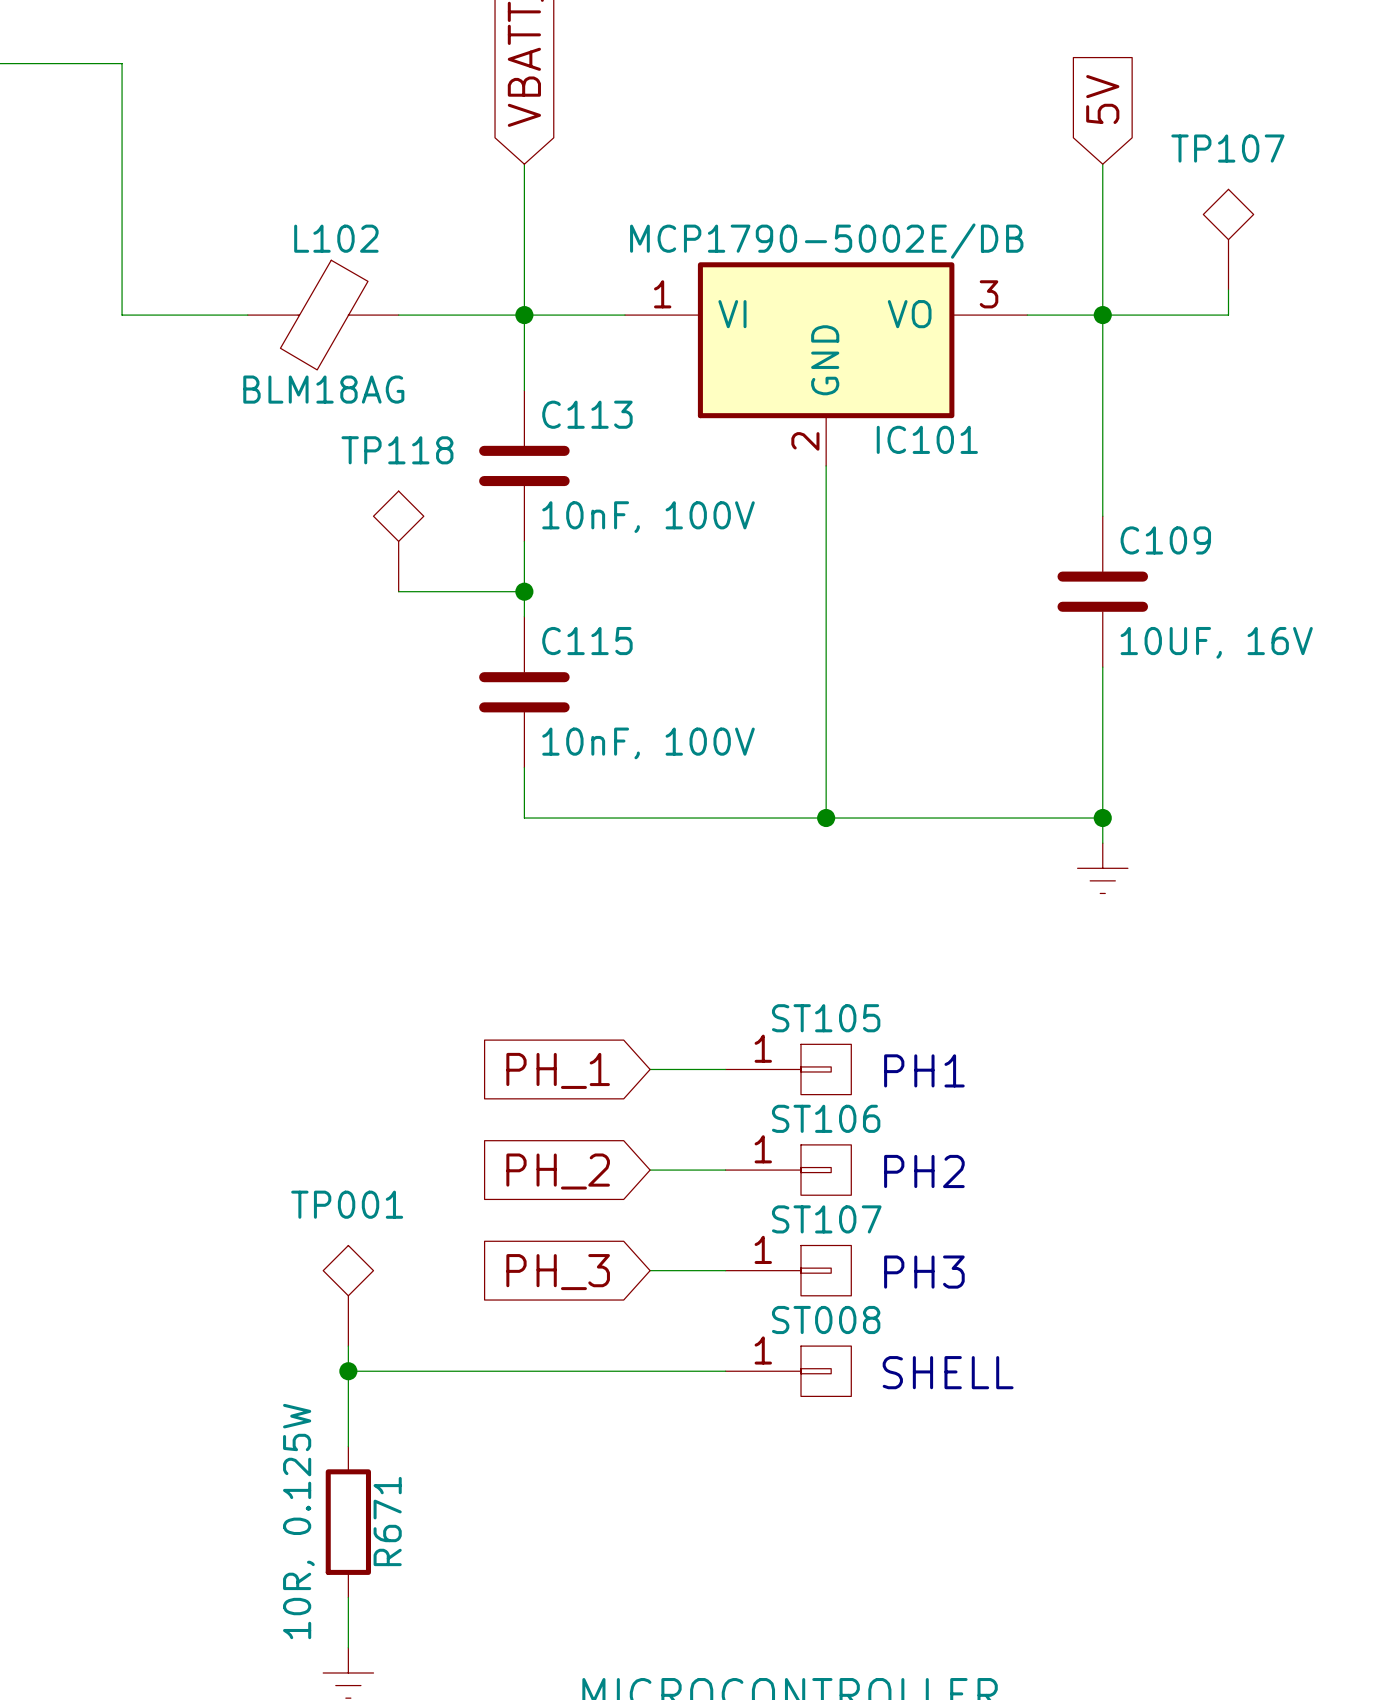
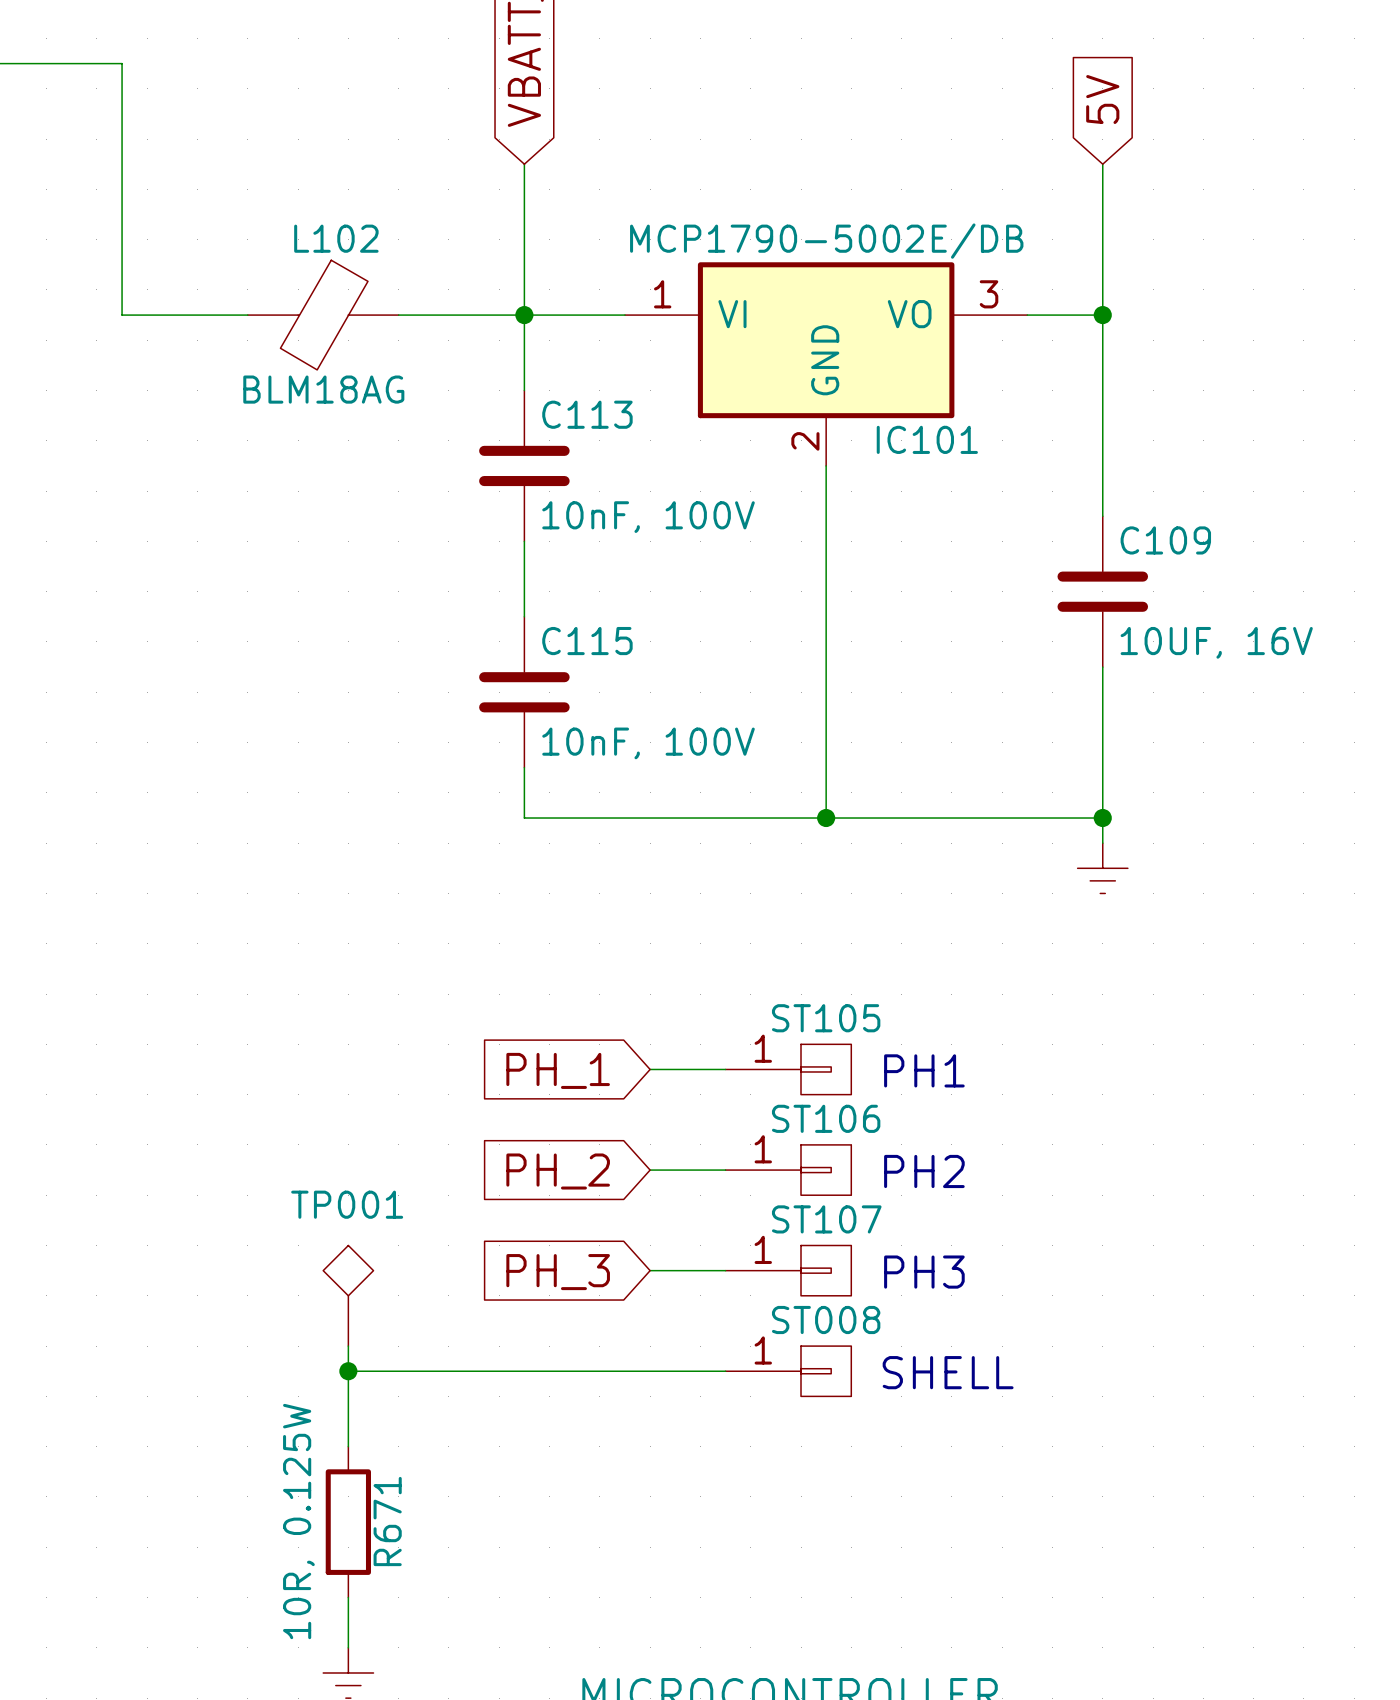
TP107: (1228, 239) -> none
wire: (1228, 289) (1228, 315) (1102, 315) -> none
TP118: (398, 541) -> none
wire: (398, 591) (524, 591) -> none
junction: (524, 591) -> none

